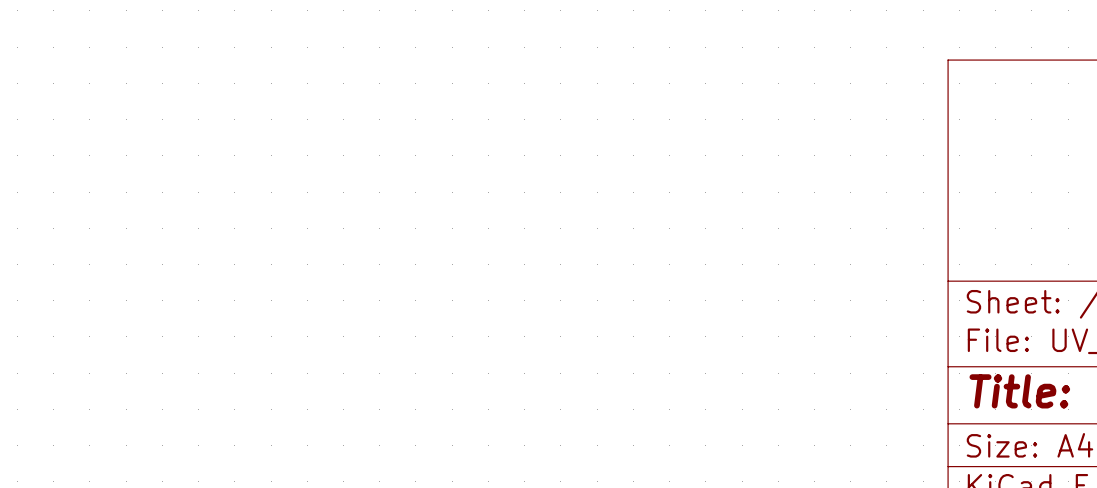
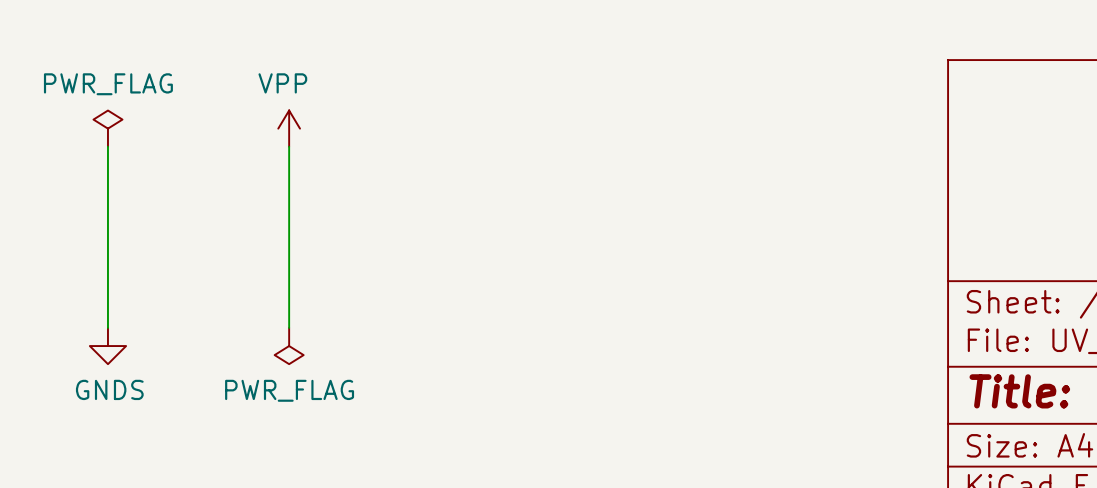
power symbol: none -> PWR_FLAG (107, 128)
power symbol: none -> VPP (289, 128)
wire: none -> (107, 146) (107, 327)
wire: none -> (289, 146) (289, 327)
power symbol: none -> GNDS (107, 346)
power symbol: none -> PWR_FLAG (289, 346)

